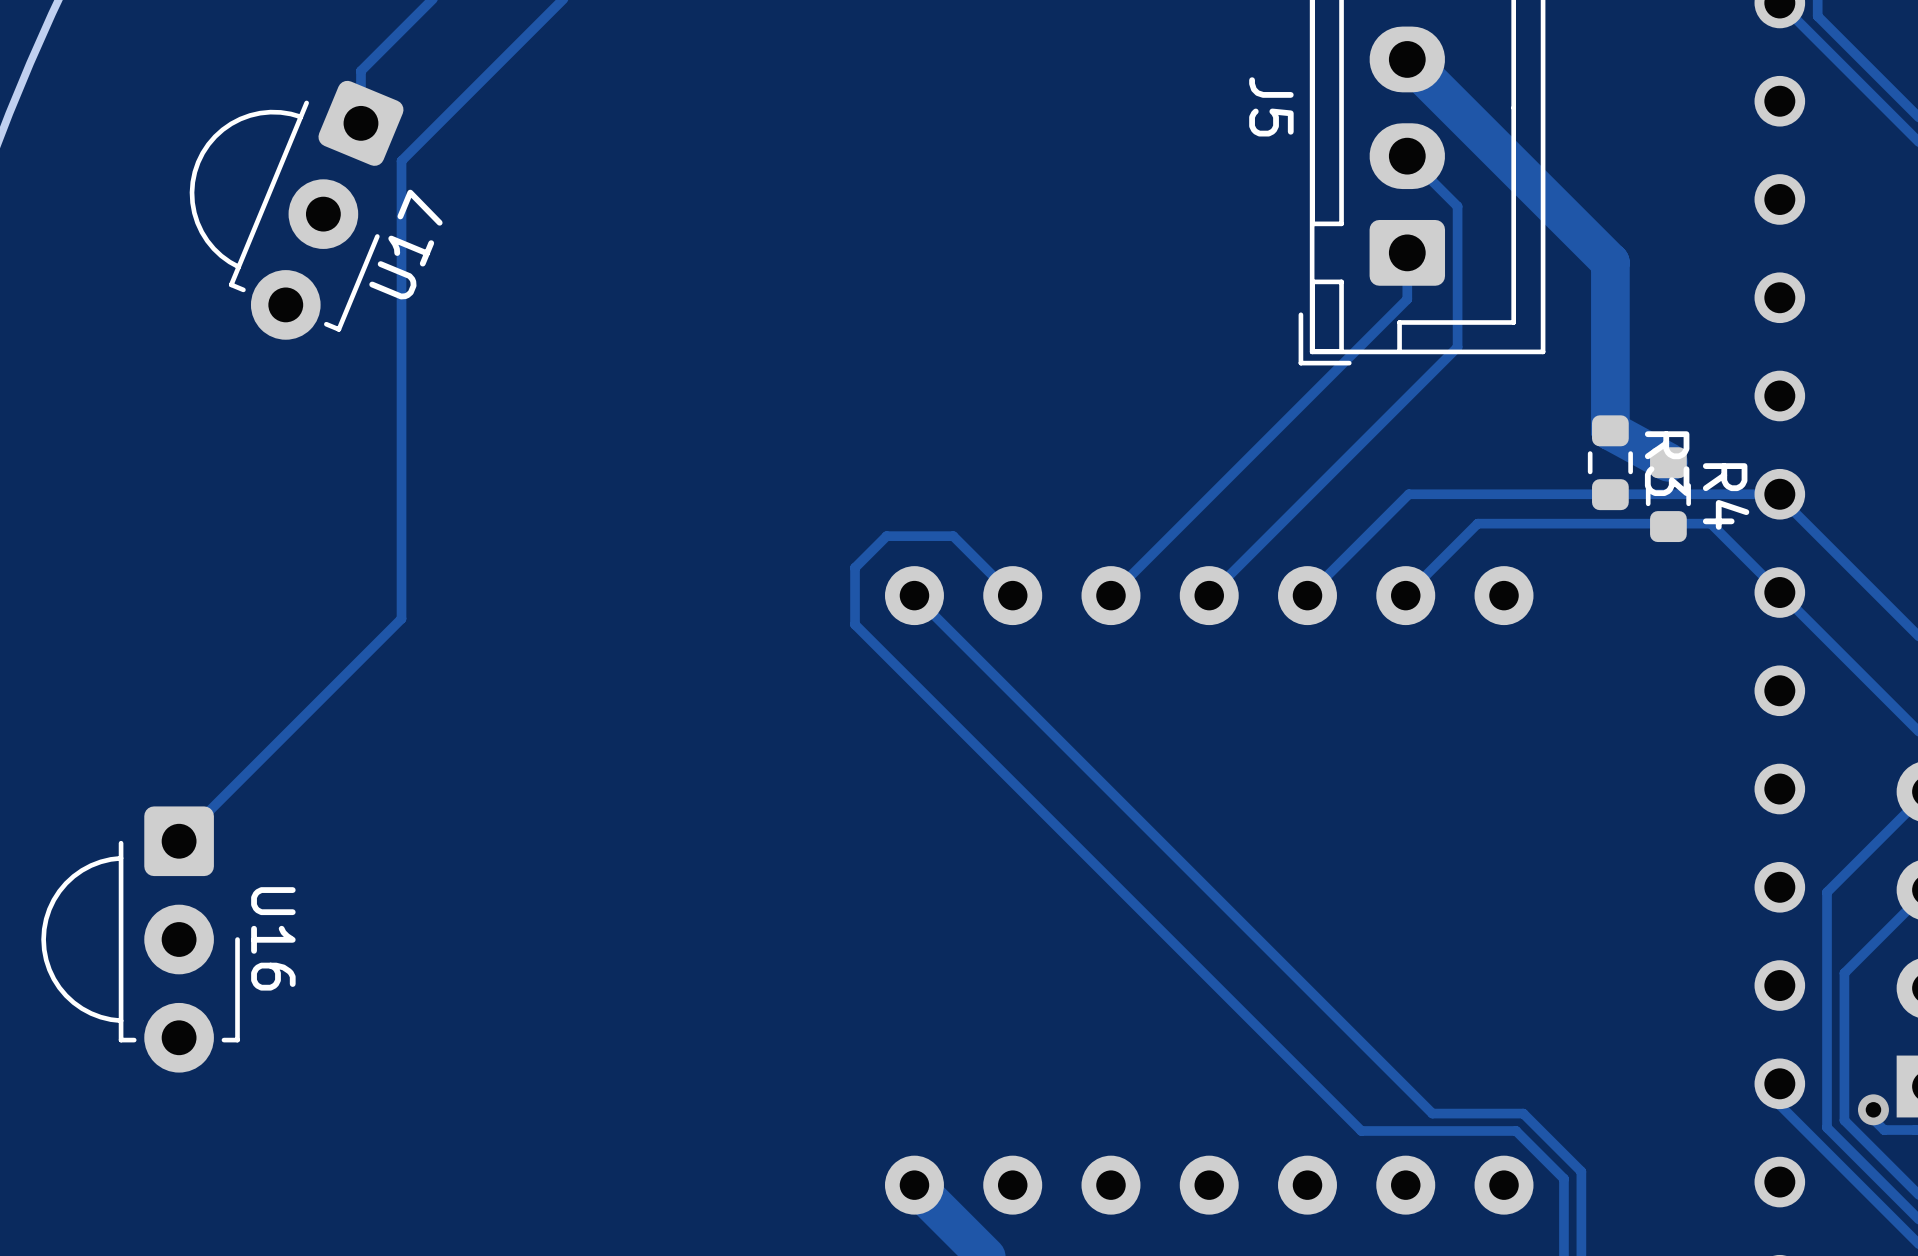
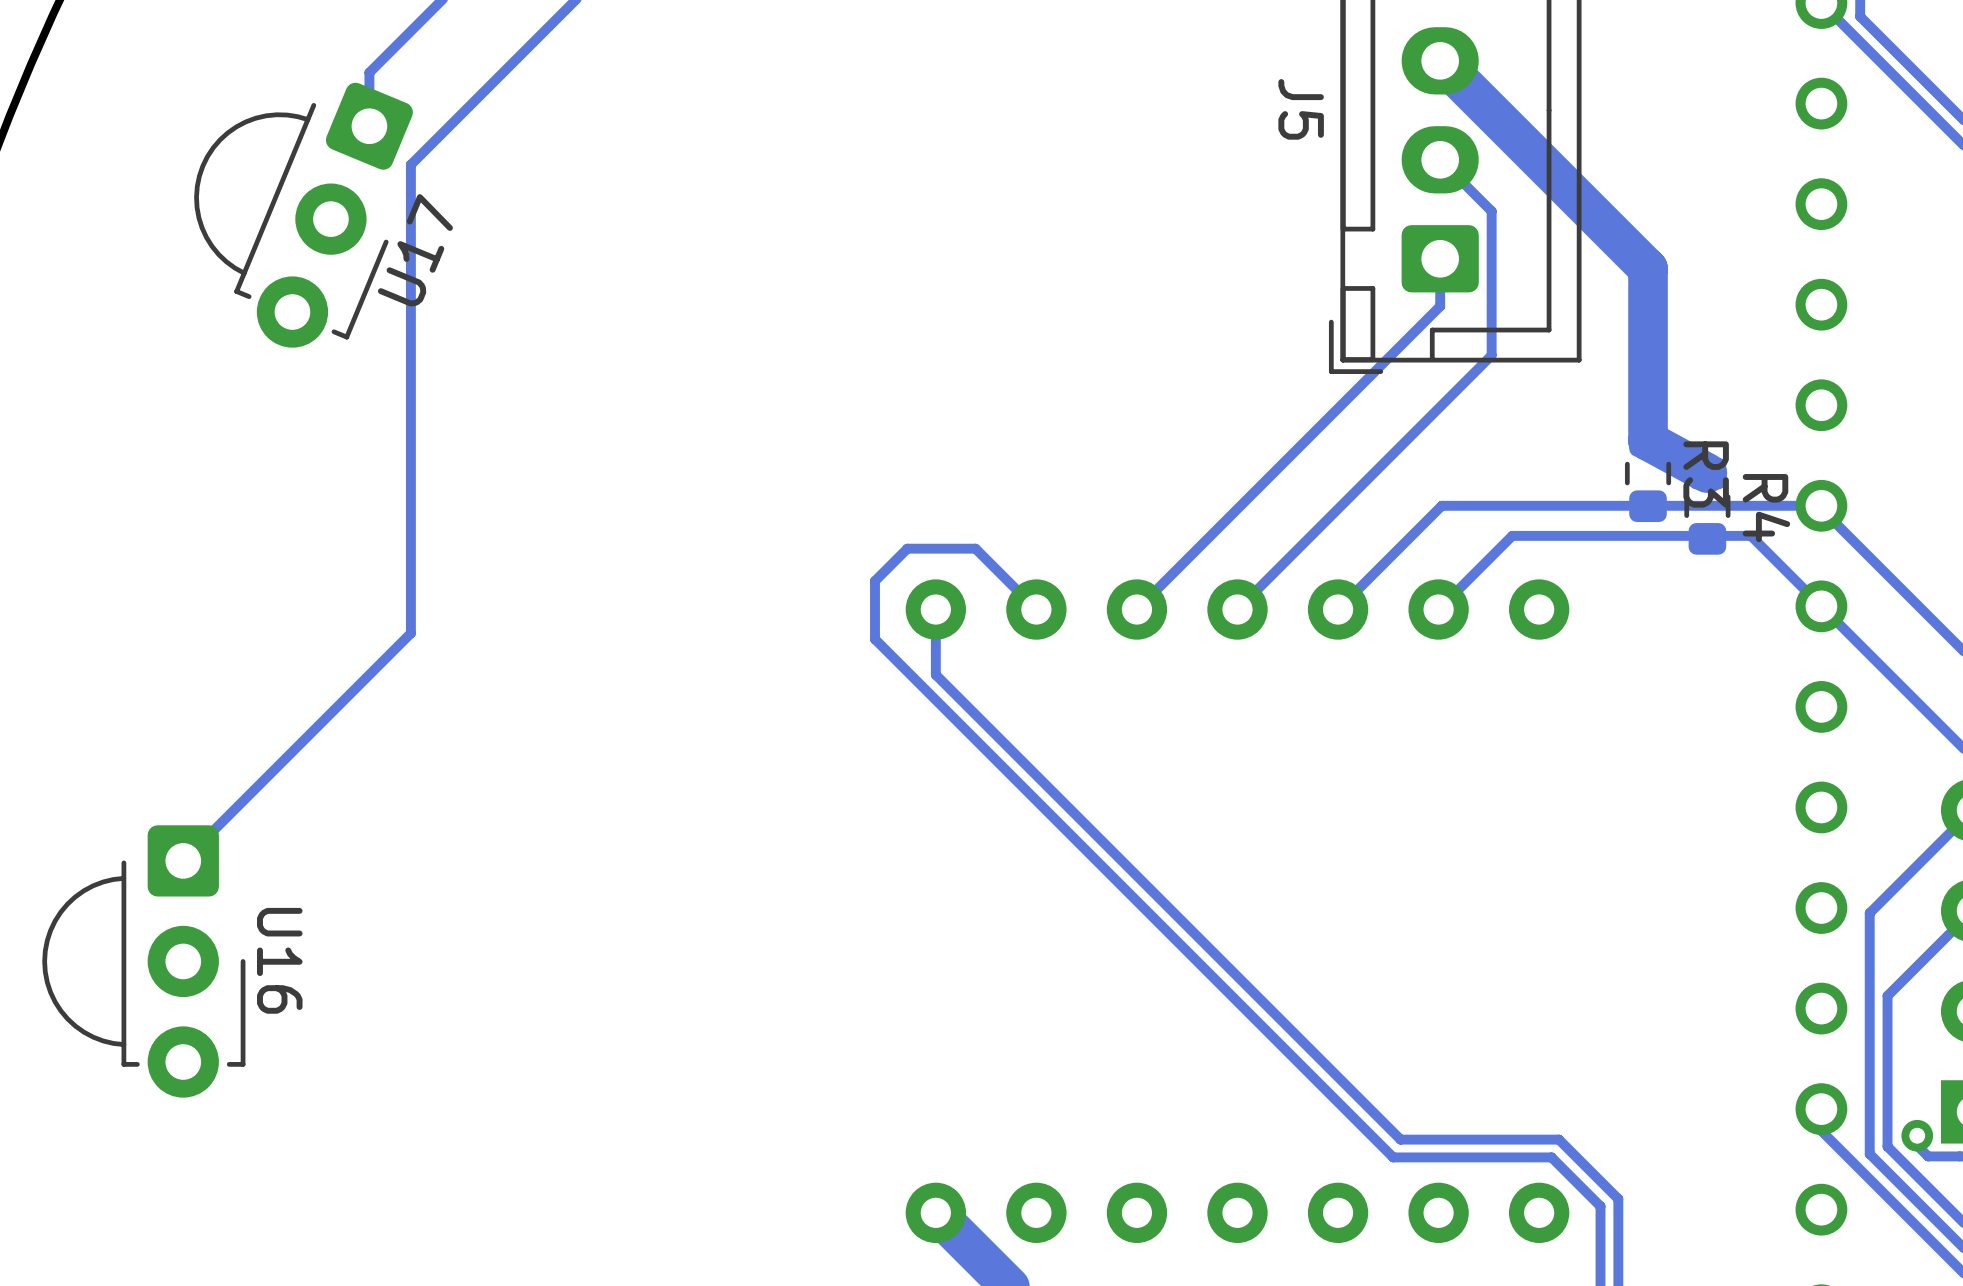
track: (914, 595) (1432, 1113) -> (935, 609) (935, 674) (1400, 1139) (1465, 1139)

